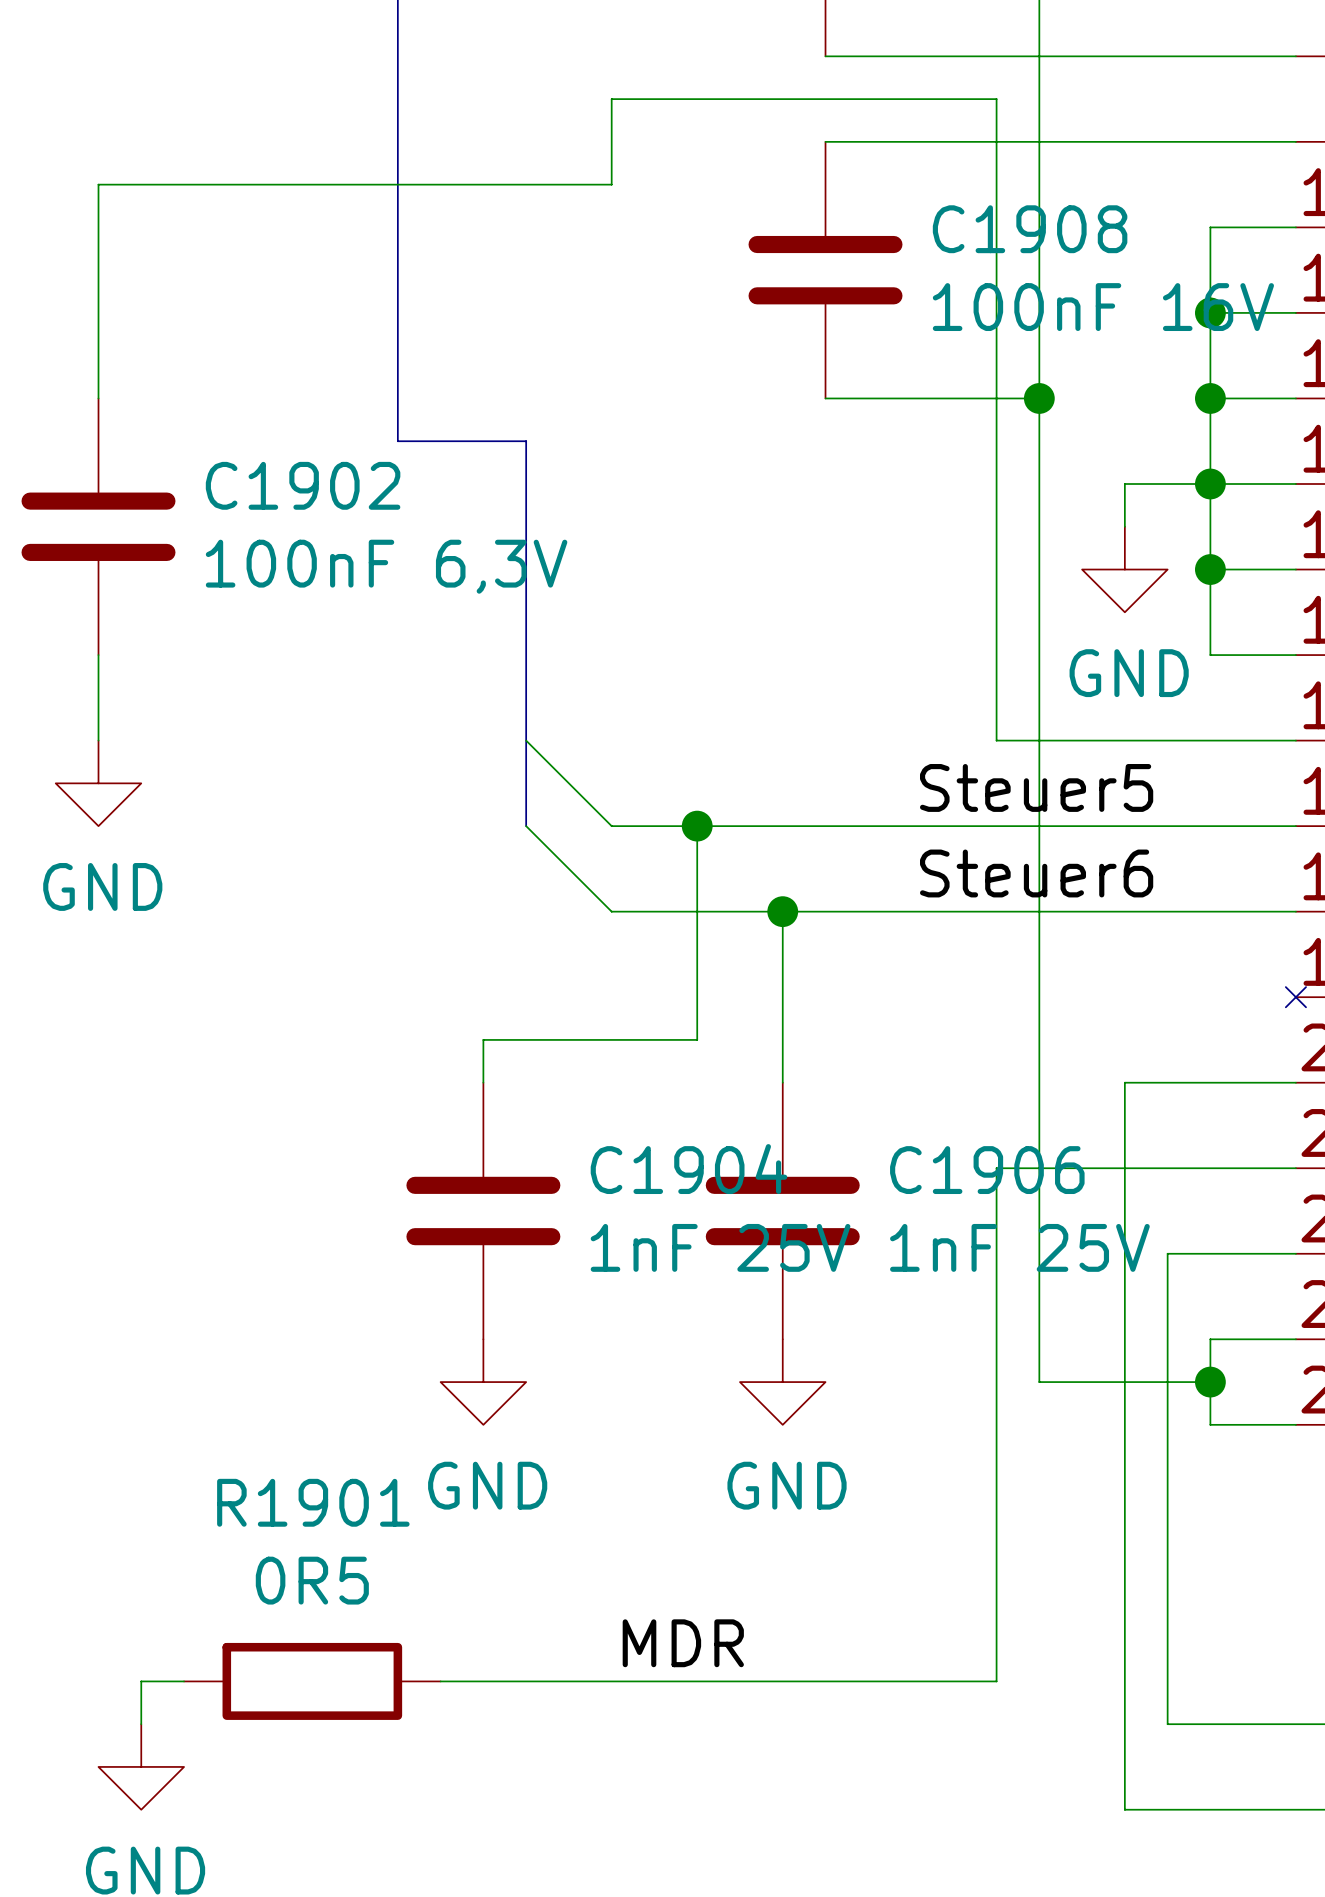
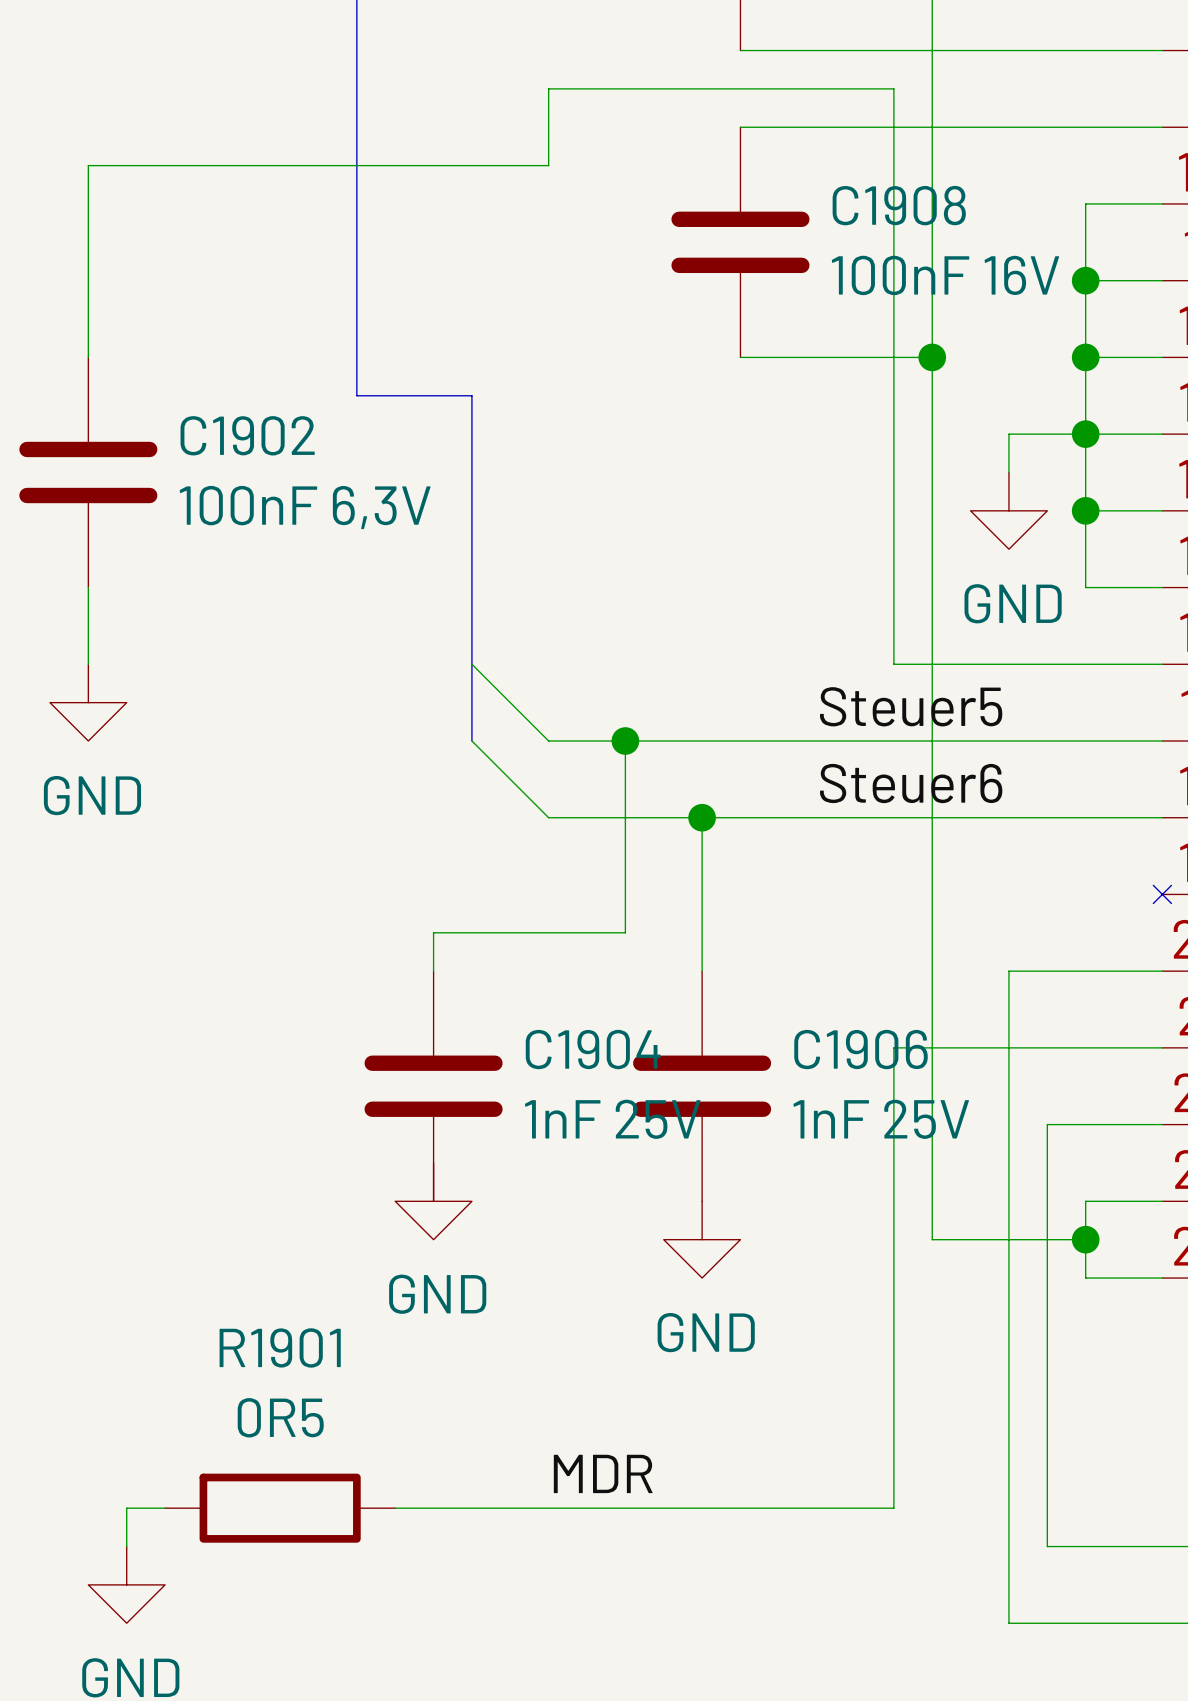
power symbol position: GND (483, 1382) -> GND (433, 1201)

